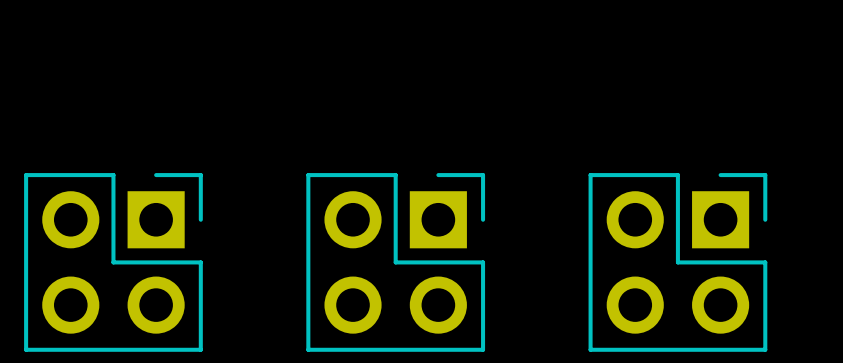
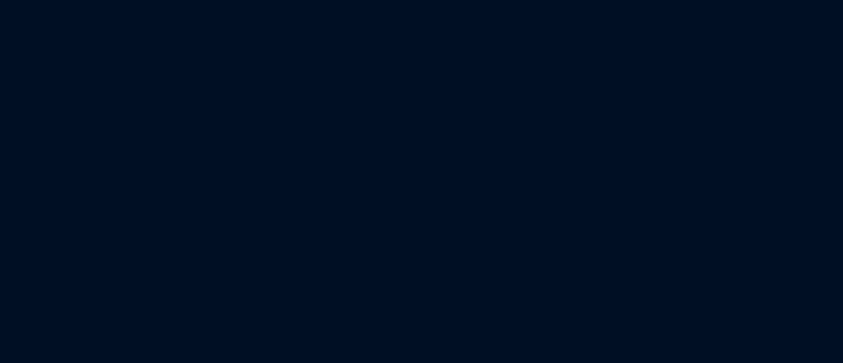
part: (113, 262) -> none
part: (395, 262) -> none
part: (677, 262) -> none

